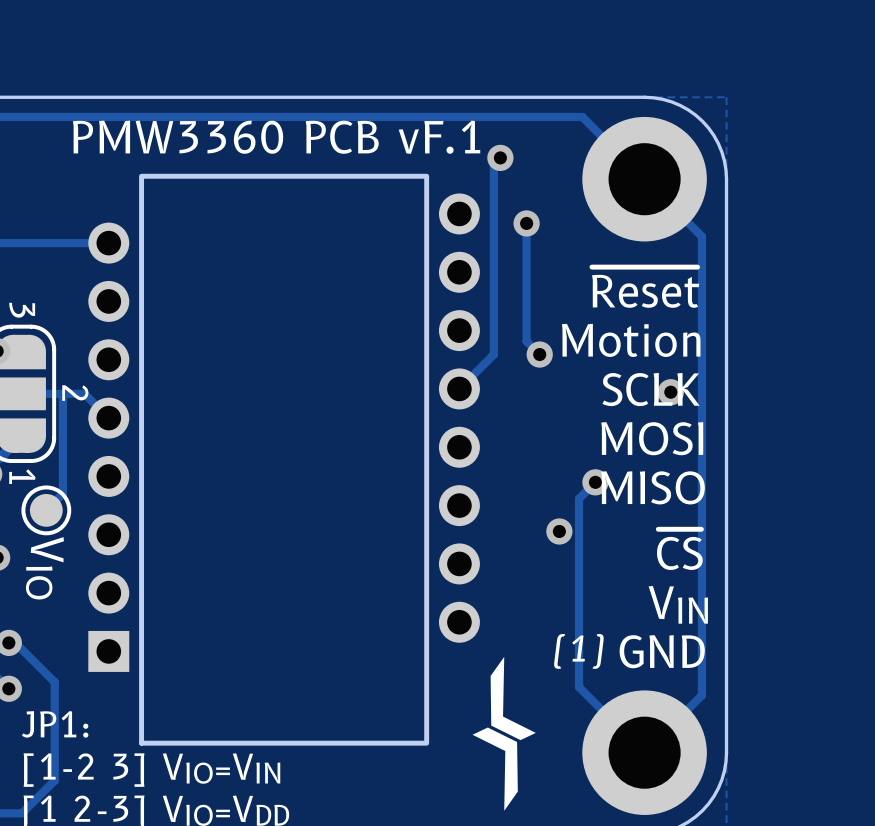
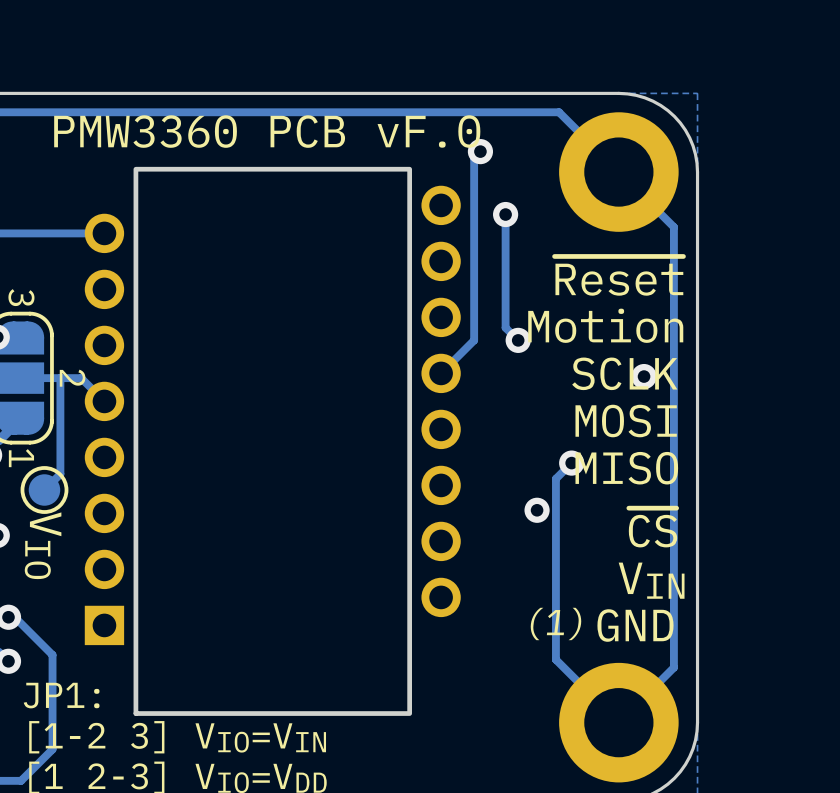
text: PMW3360 PCB vF.1 (276, 137) -> PMW3360 PCB vF.0 (267, 131)
drawing: [472, 656, 536, 811] -> none

